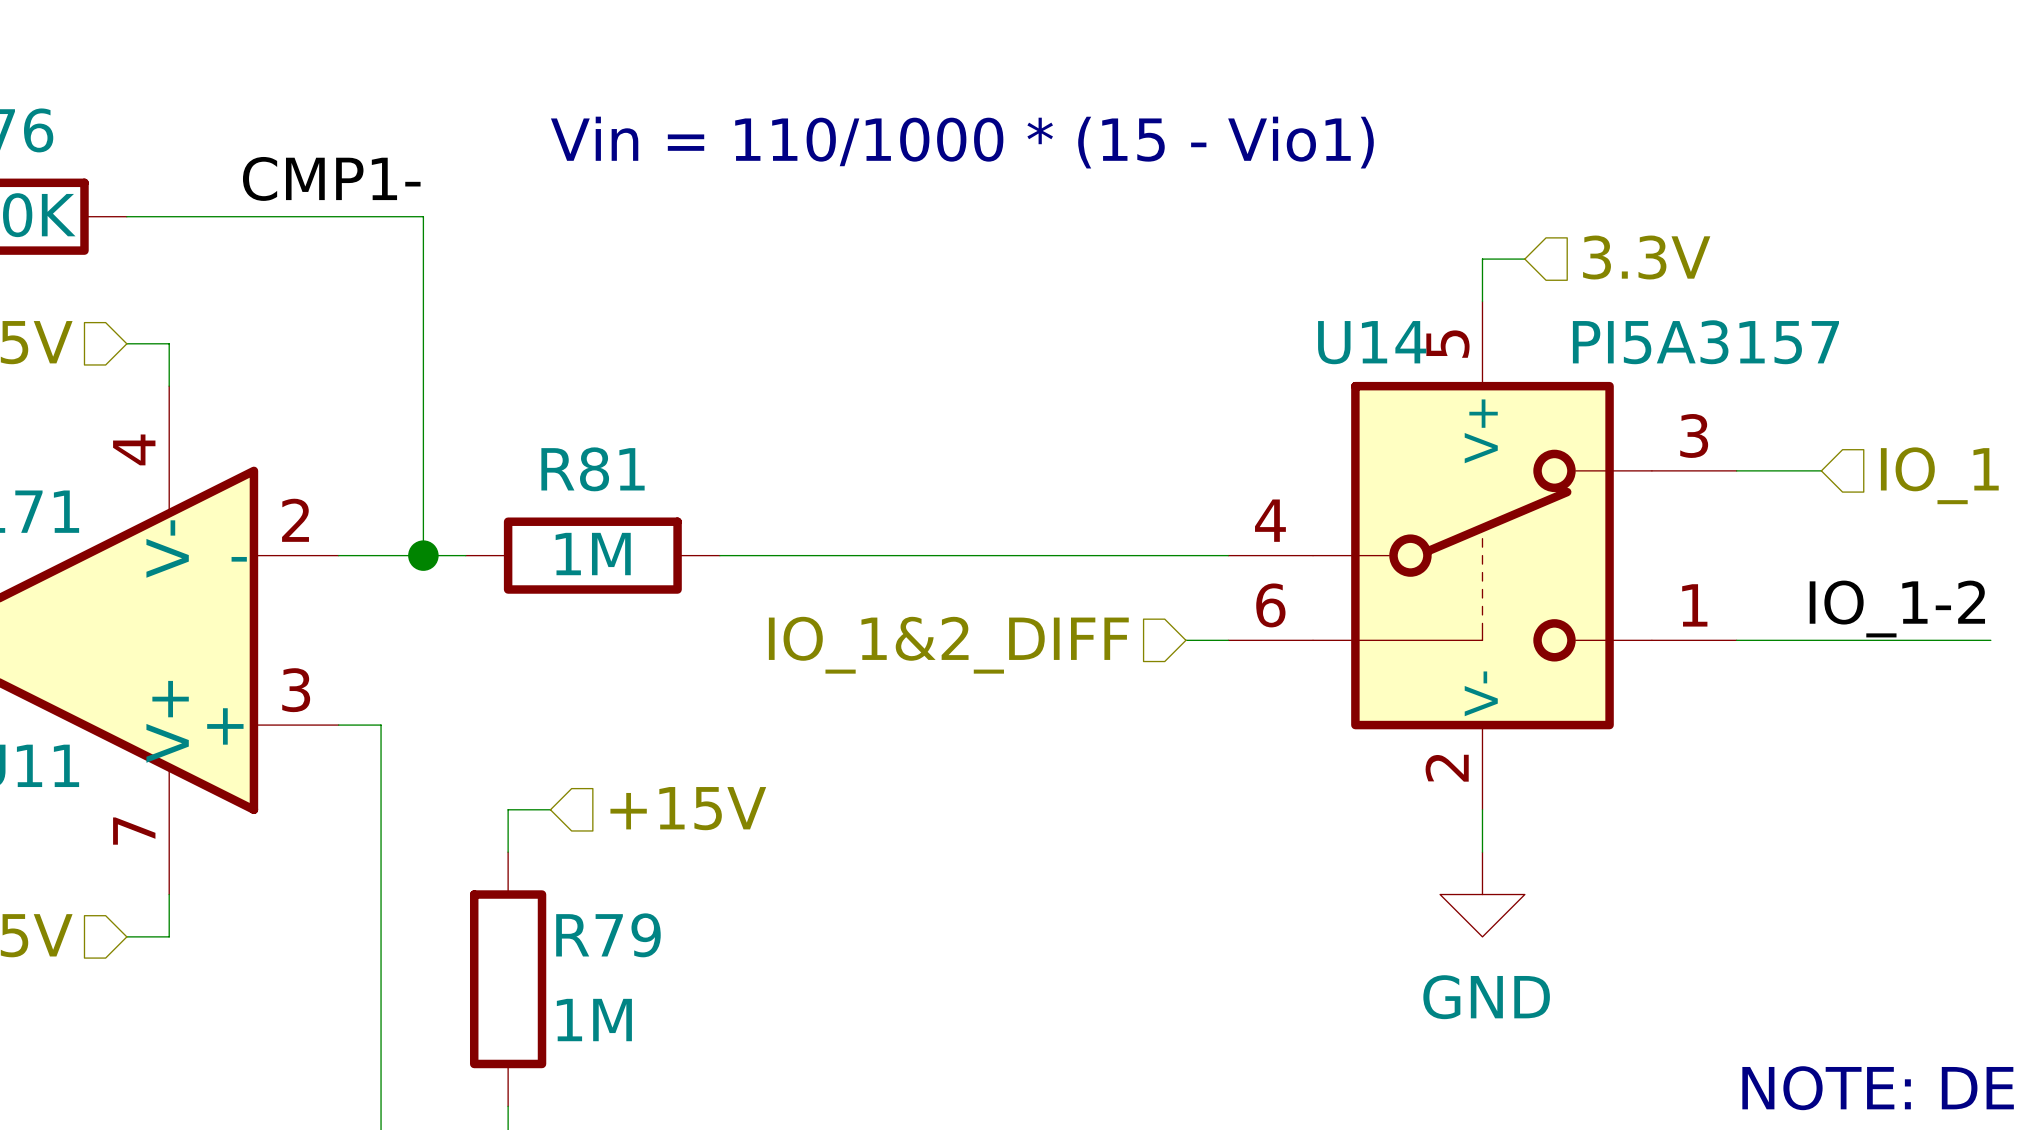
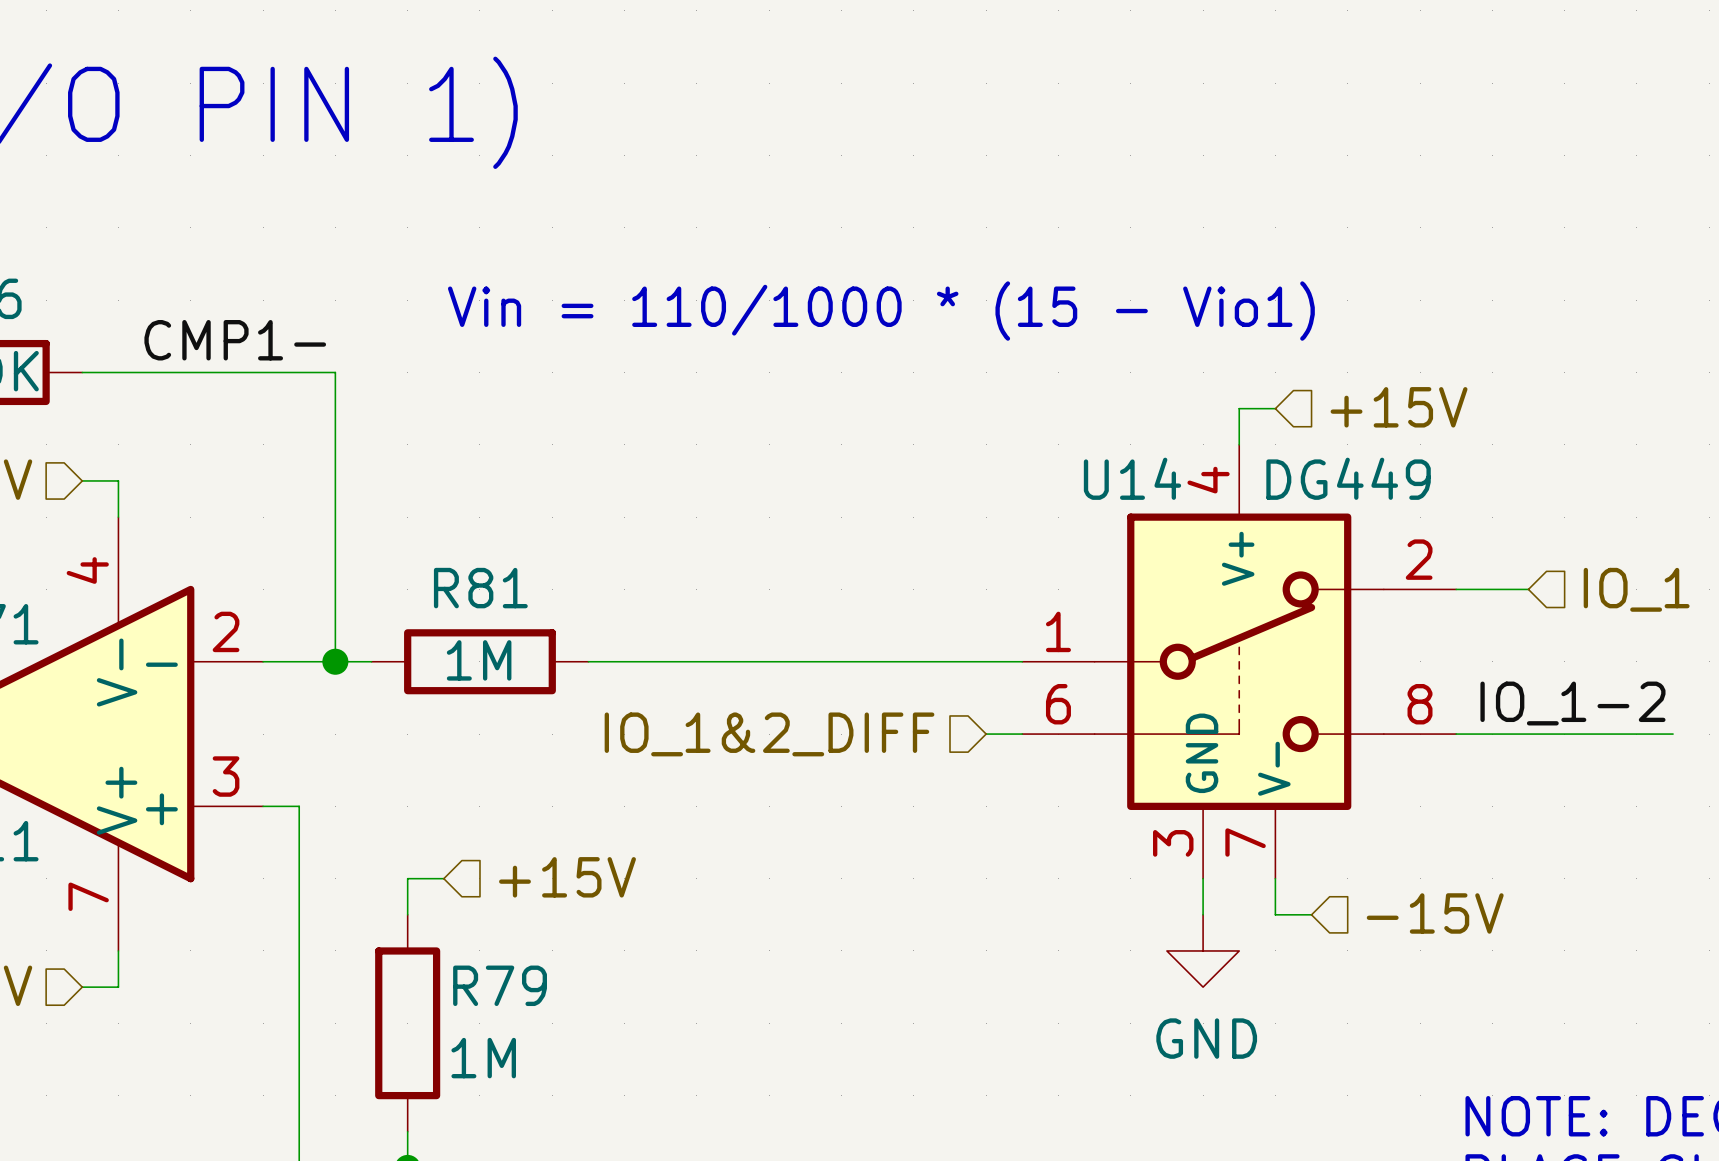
hierarchical label: 3.3V (1646, 257) -> +15V (1399, 407)
U14 symbol: [1228, 301, 1737, 810] -> [1022, 444, 1457, 879]
U14 value: PI5A3157 (1705, 342) -> DG449 (1348, 478)
wire: (1482, 809) (1482, 852) -> (1203, 878) (1203, 914)
wire: none -> (1275, 878) (1275, 914) (1311, 914)
hierarchical label: none -> -15V (1435, 913)
power symbol position: GND (1482, 894) -> GND (1203, 950)

